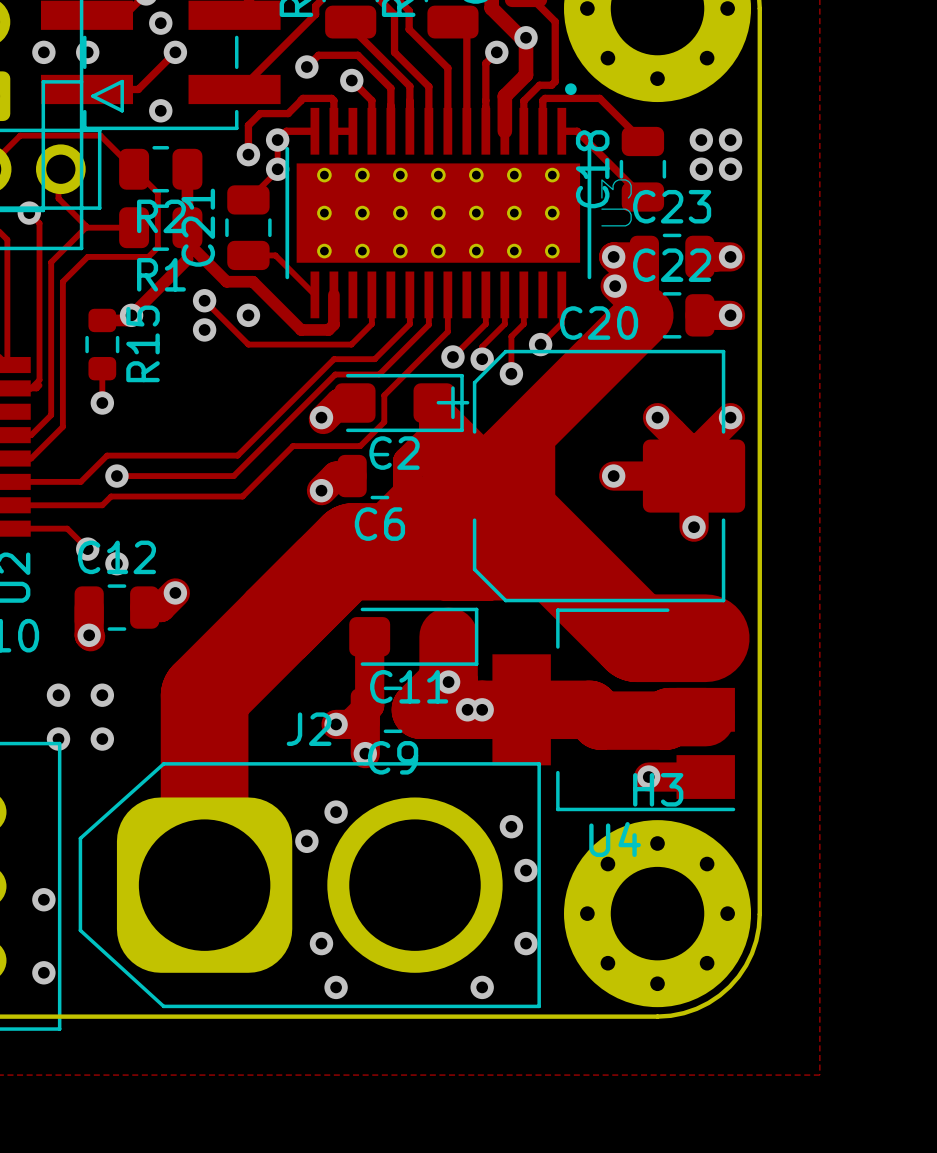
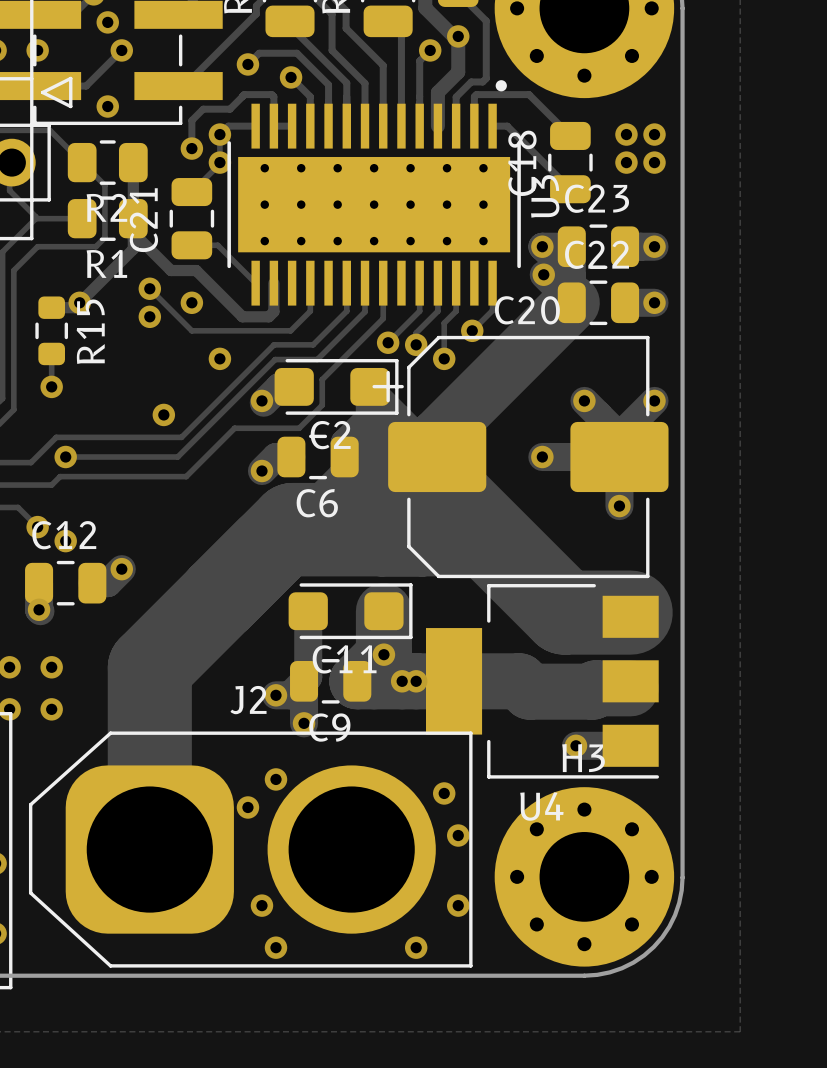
via: none -> (219, 358)
via: none -> (163, 414)

